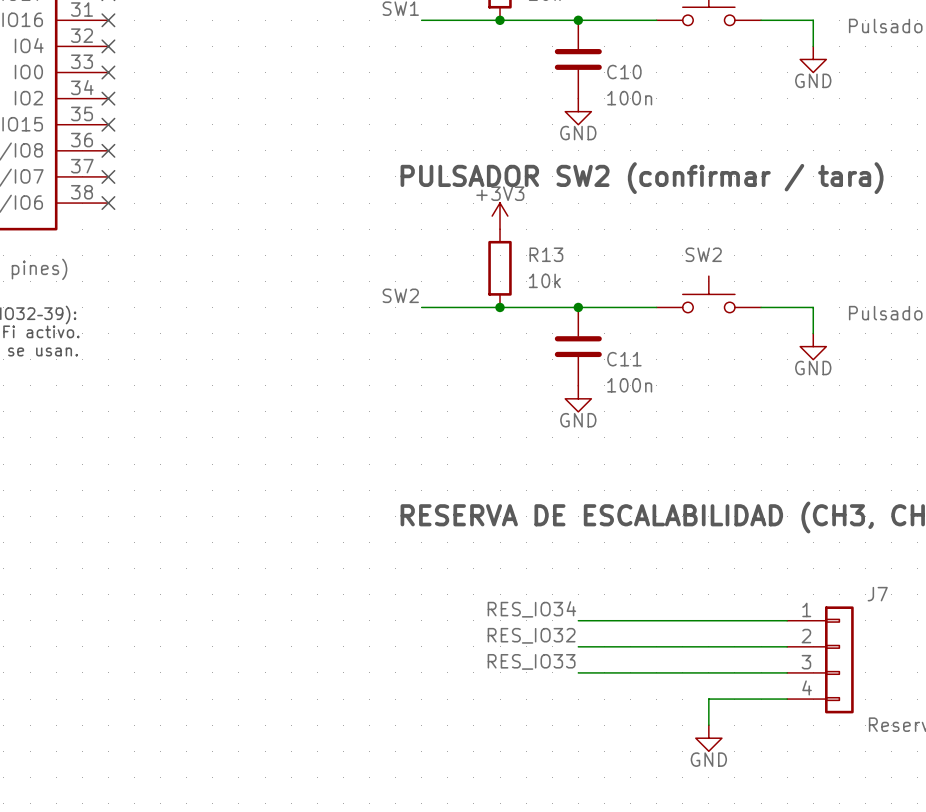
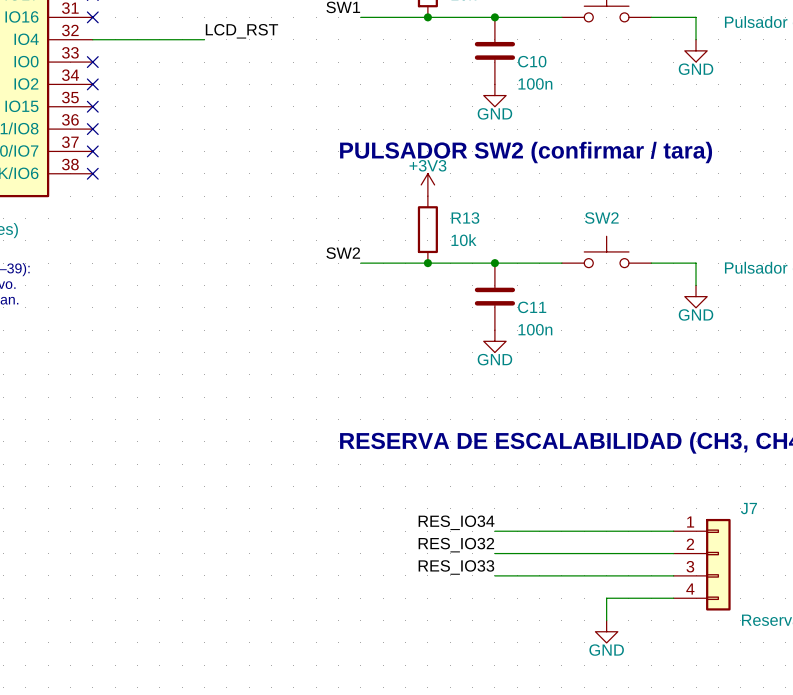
label: none -> LCD_RST (241, 31)
wire: none -> (92, 39) (204, 39)
no-connect mark: (108, 46) -> none

